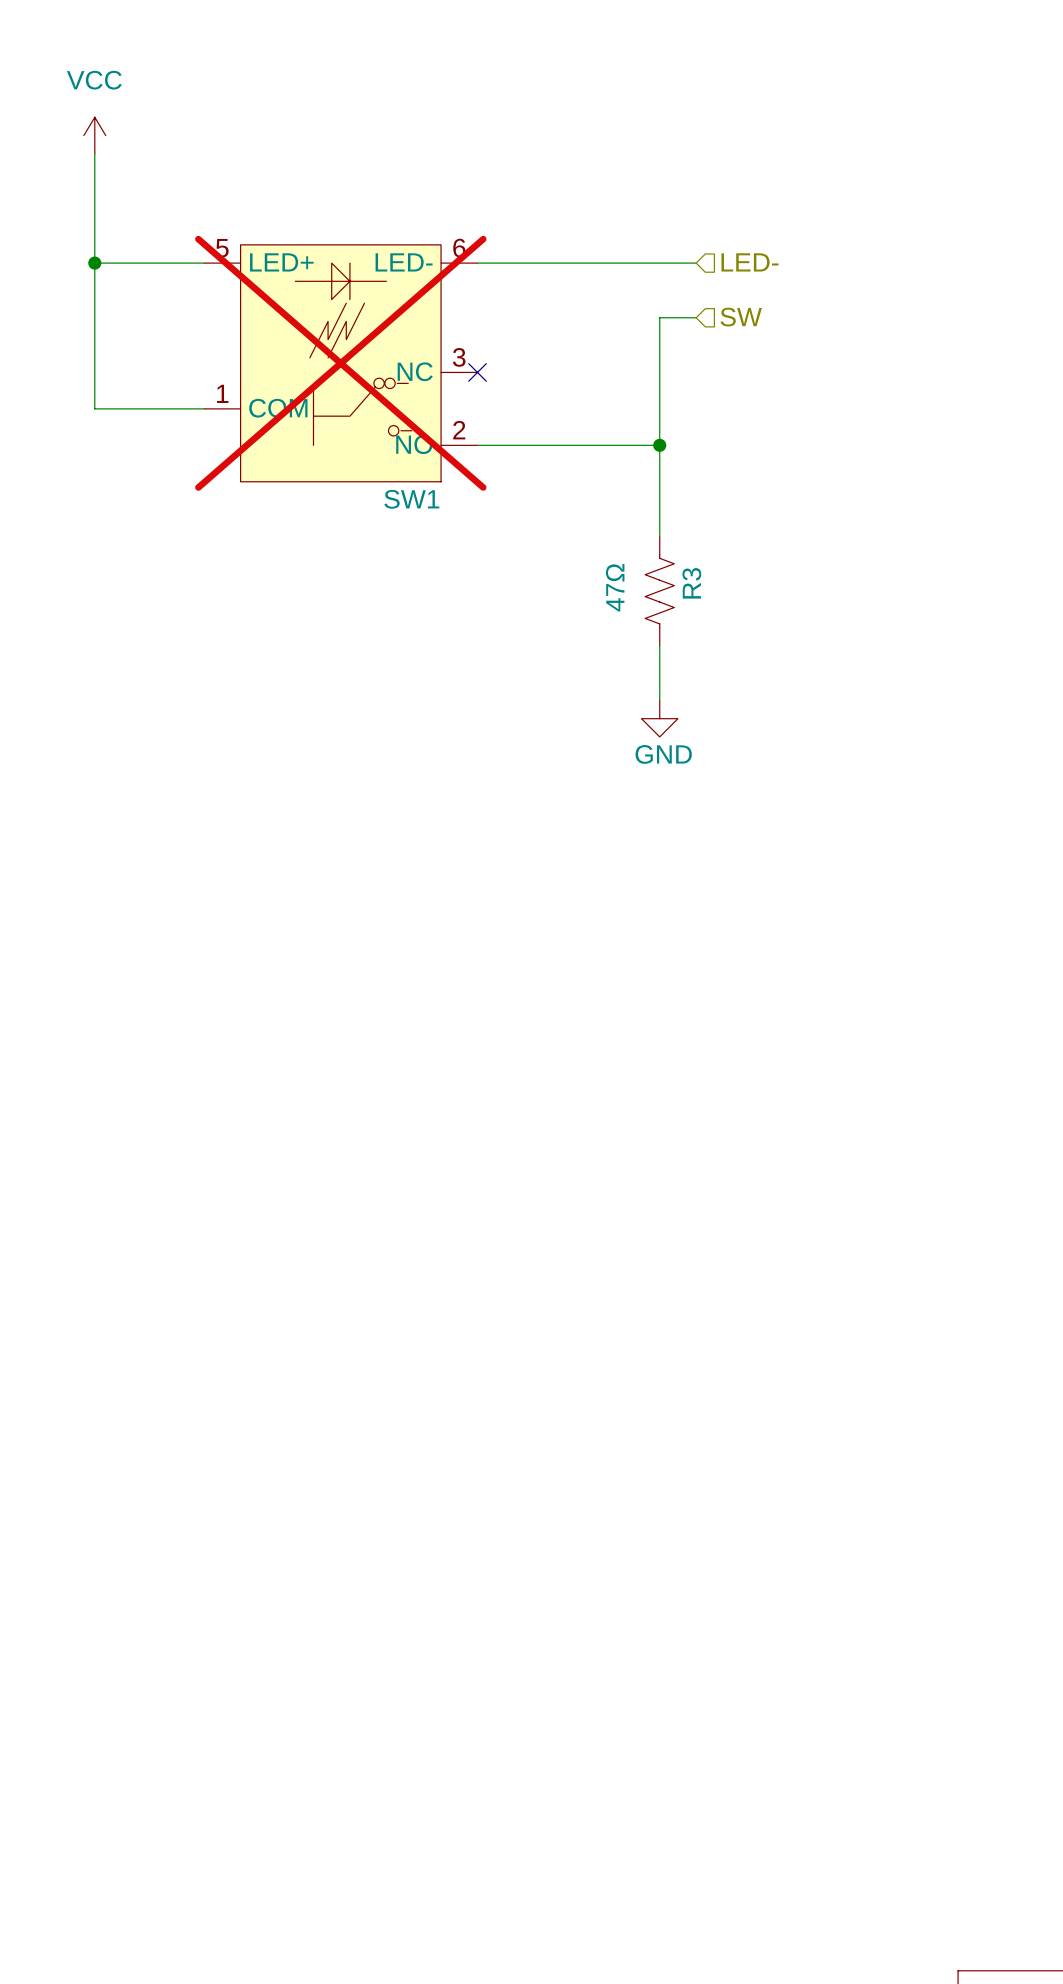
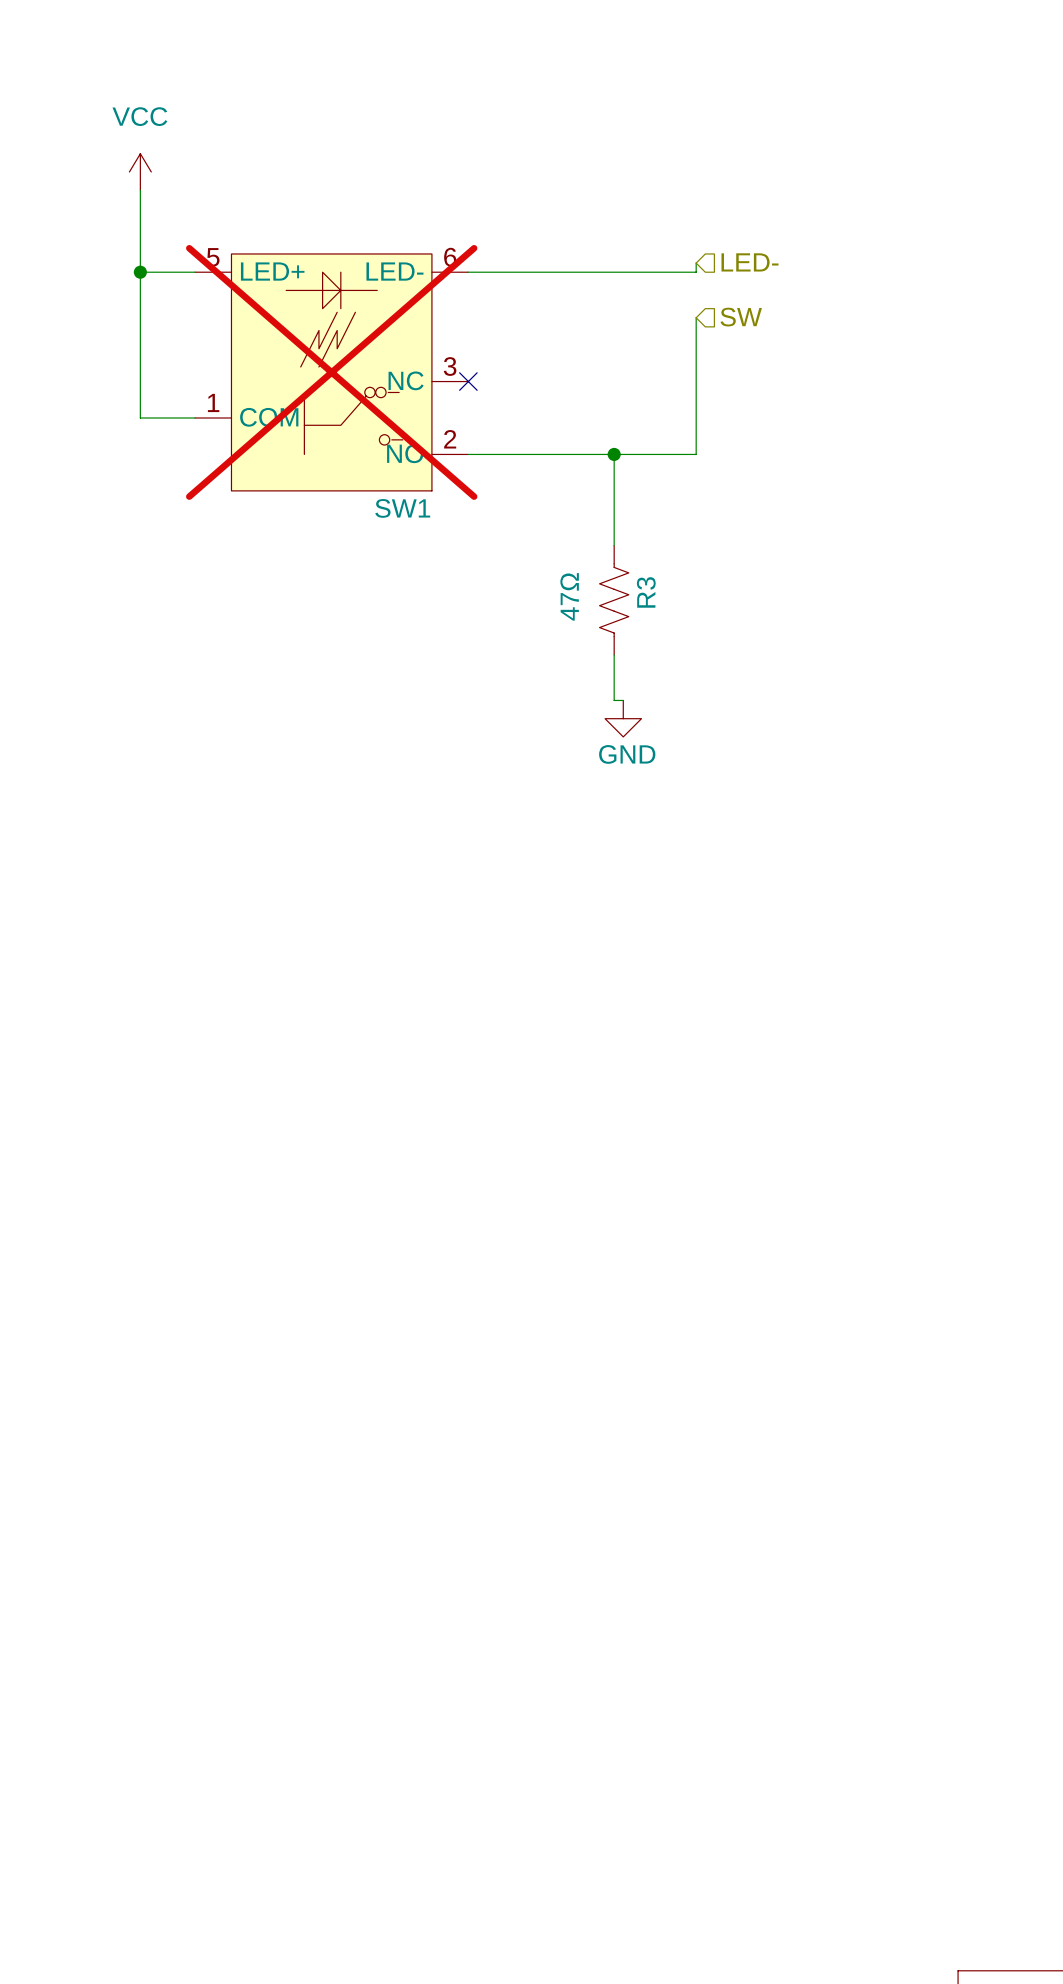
power symbol position: VCC (94, 135) -> VCC (140, 171)
wire: (94, 153) (94, 408) (204, 408) -> none
wire: none -> (140, 190) (140, 418) (195, 418)
wire: (94, 263) (204, 263) -> none
junction position: (94, 263) -> (140, 272)
wire: (477, 263) (696, 263) -> (468, 272) (696, 272) (696, 263)
wire: none -> (140, 272) (195, 272)
wire: (696, 317) (659, 317) (659, 536) -> (696, 317) (696, 454) (468, 454)
SW1 position: (340, 363) -> (331, 372)
no-connect mark position: (477, 372) -> (468, 381)
wire: (477, 445) (659, 445) -> none
junction position: (659, 445) -> (614, 454)
wire: none -> (614, 454) (614, 545)
R3 position: (659, 591) -> (614, 600)
wire: (659, 645) (659, 700) -> none
wire: none -> (614, 654) (614, 700) (623, 700)
power symbol position: GND (659, 718) -> GND (623, 718)

